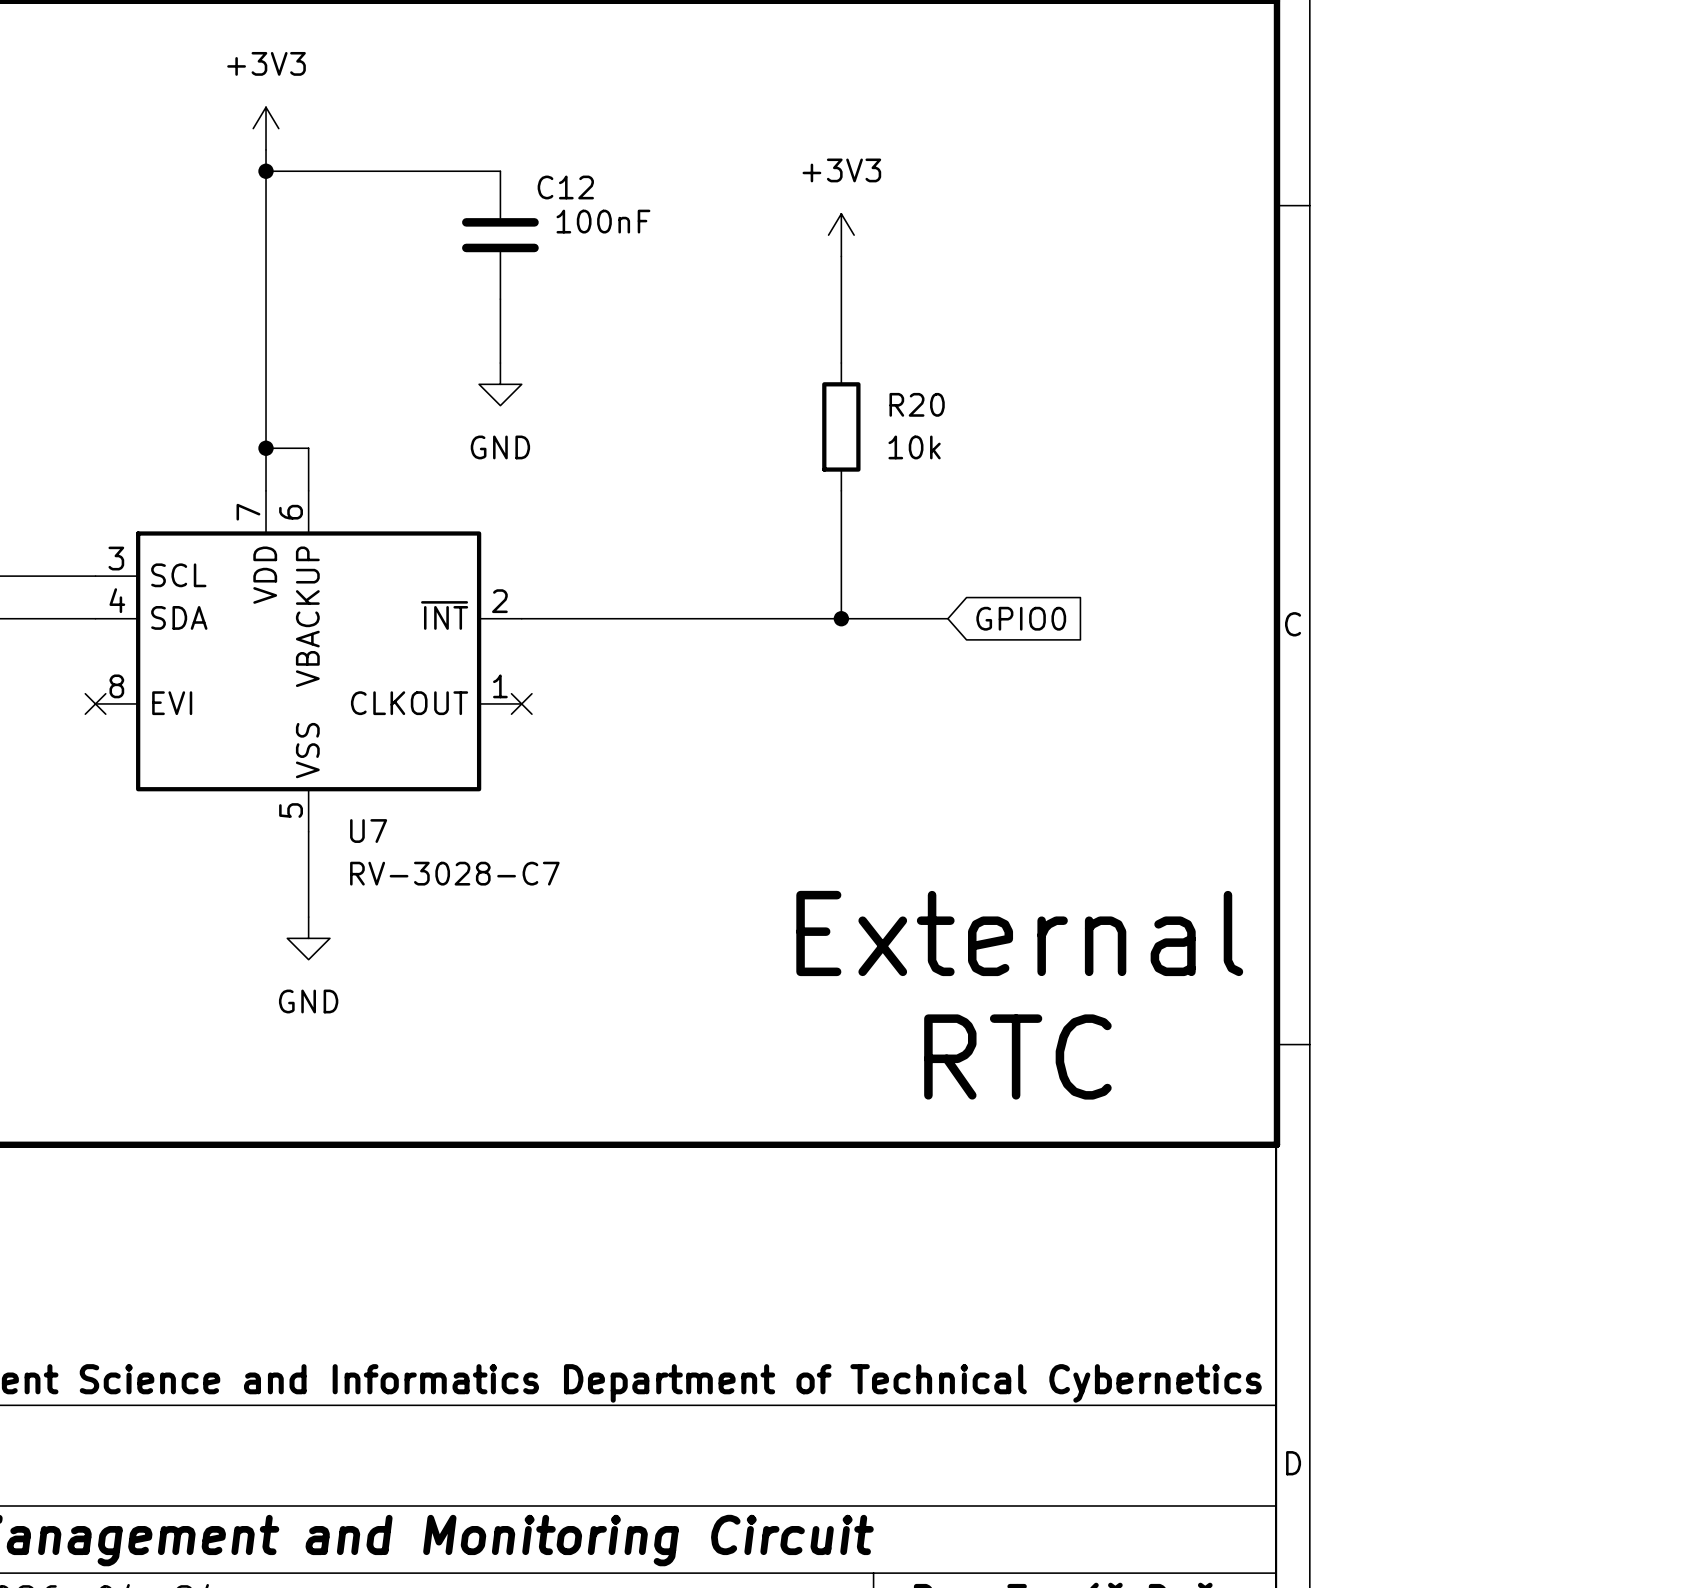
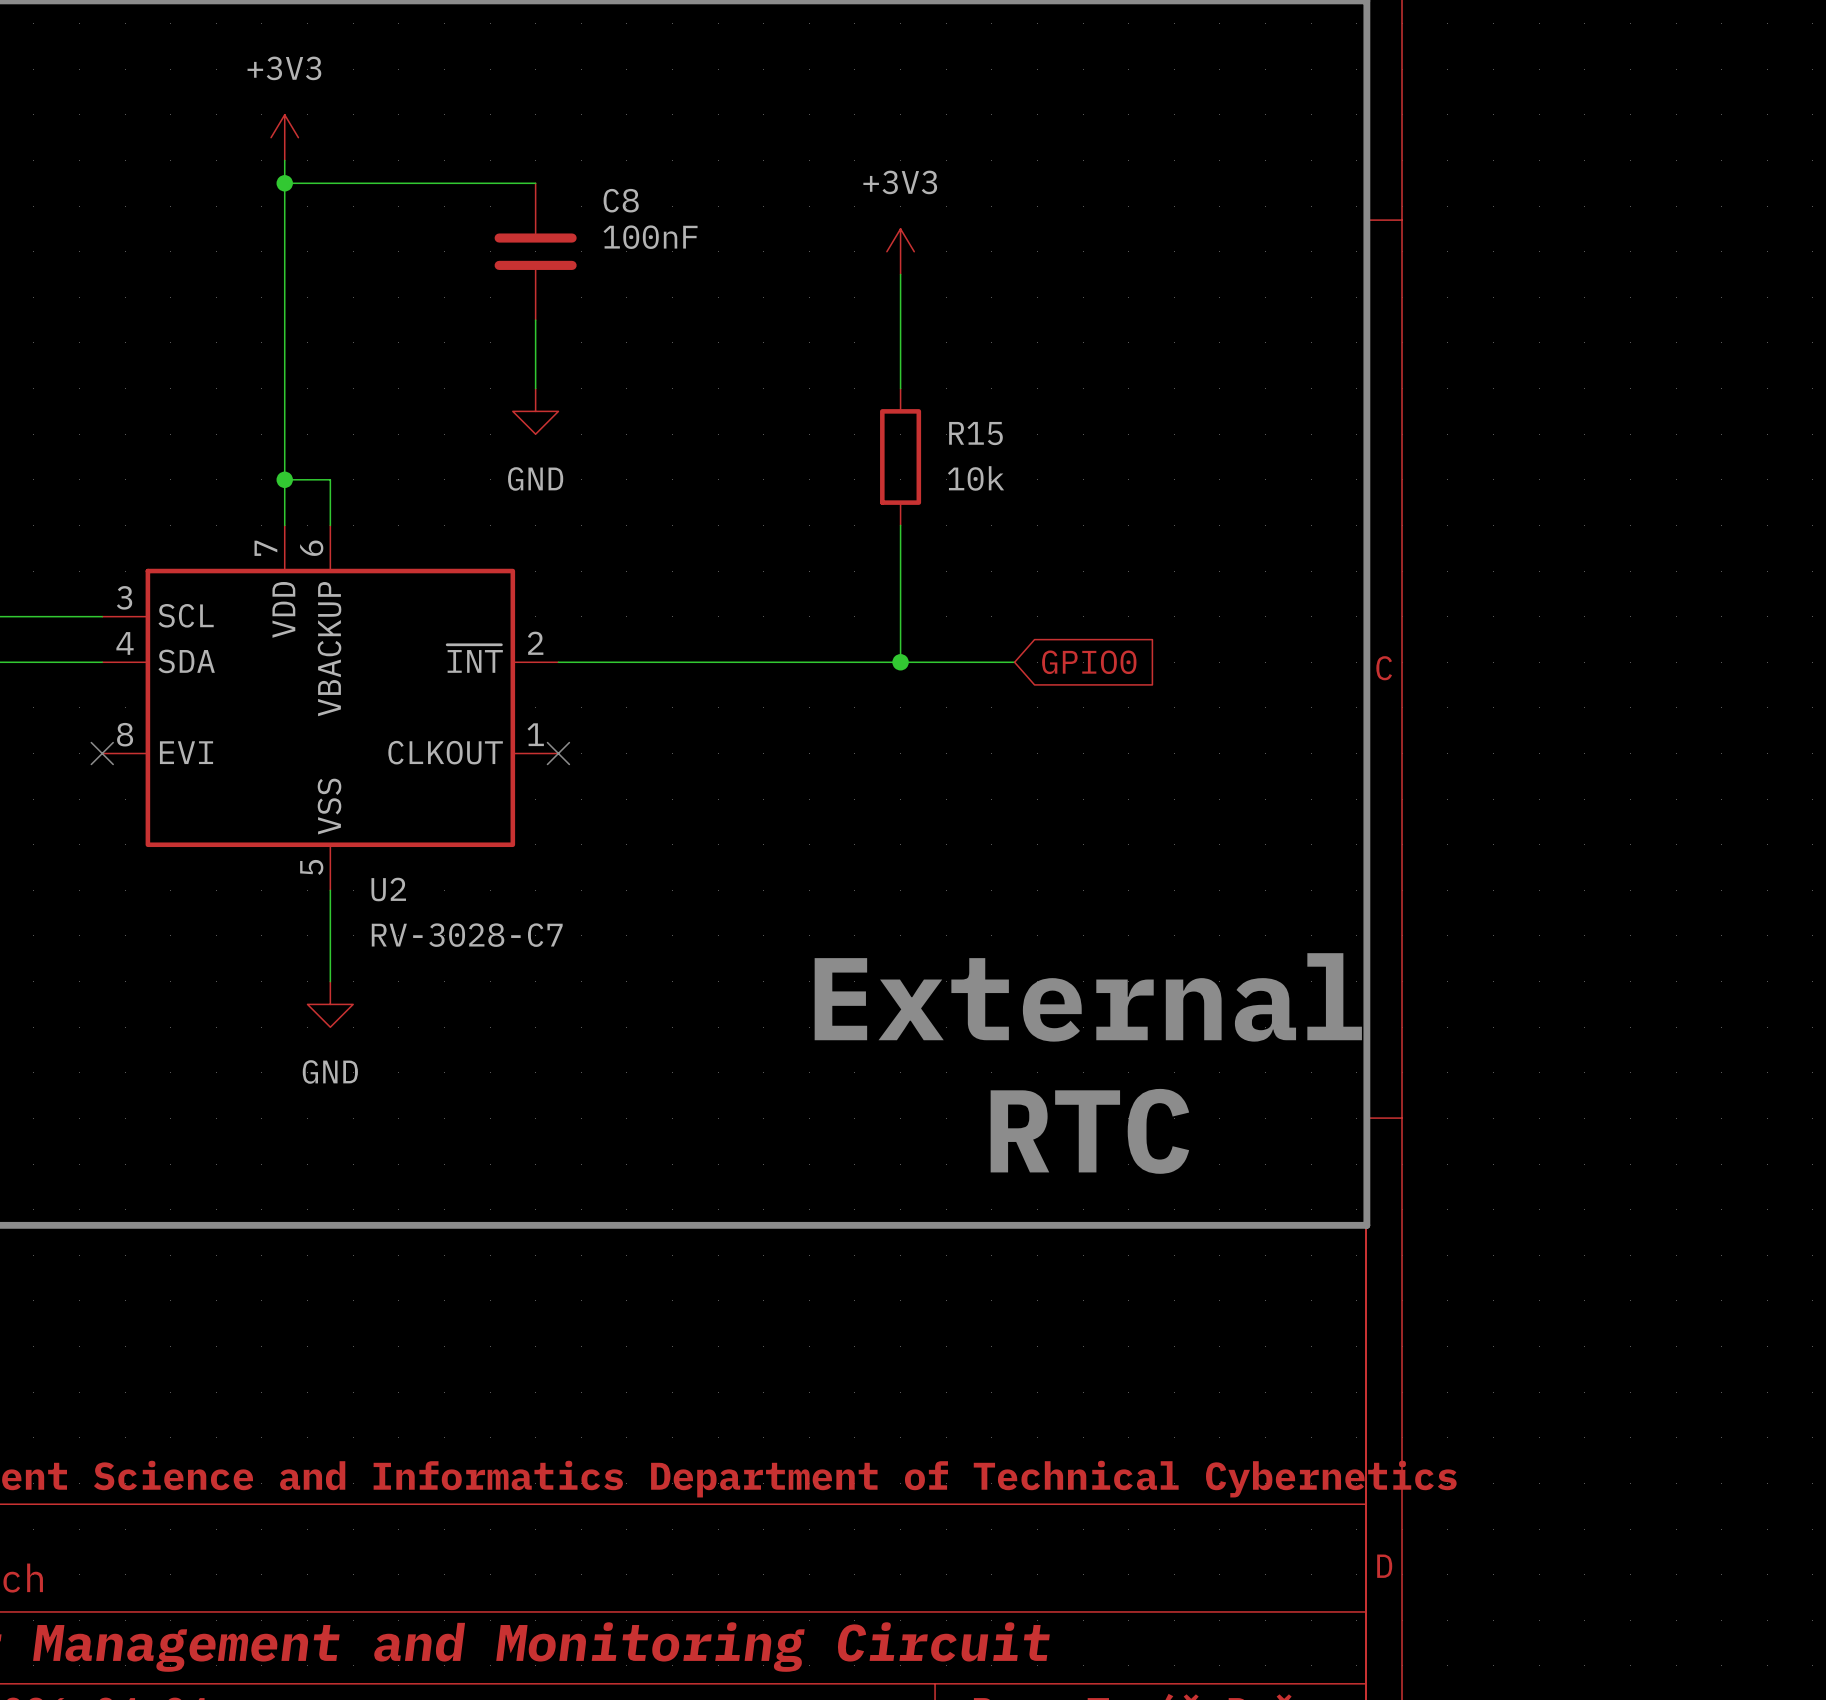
C12 name: C12 (565, 187) -> C8 (621, 200)
R20 name: R20 (917, 404) -> R15 (975, 433)
U7 name: U7 (368, 831) -> U2 (388, 889)

